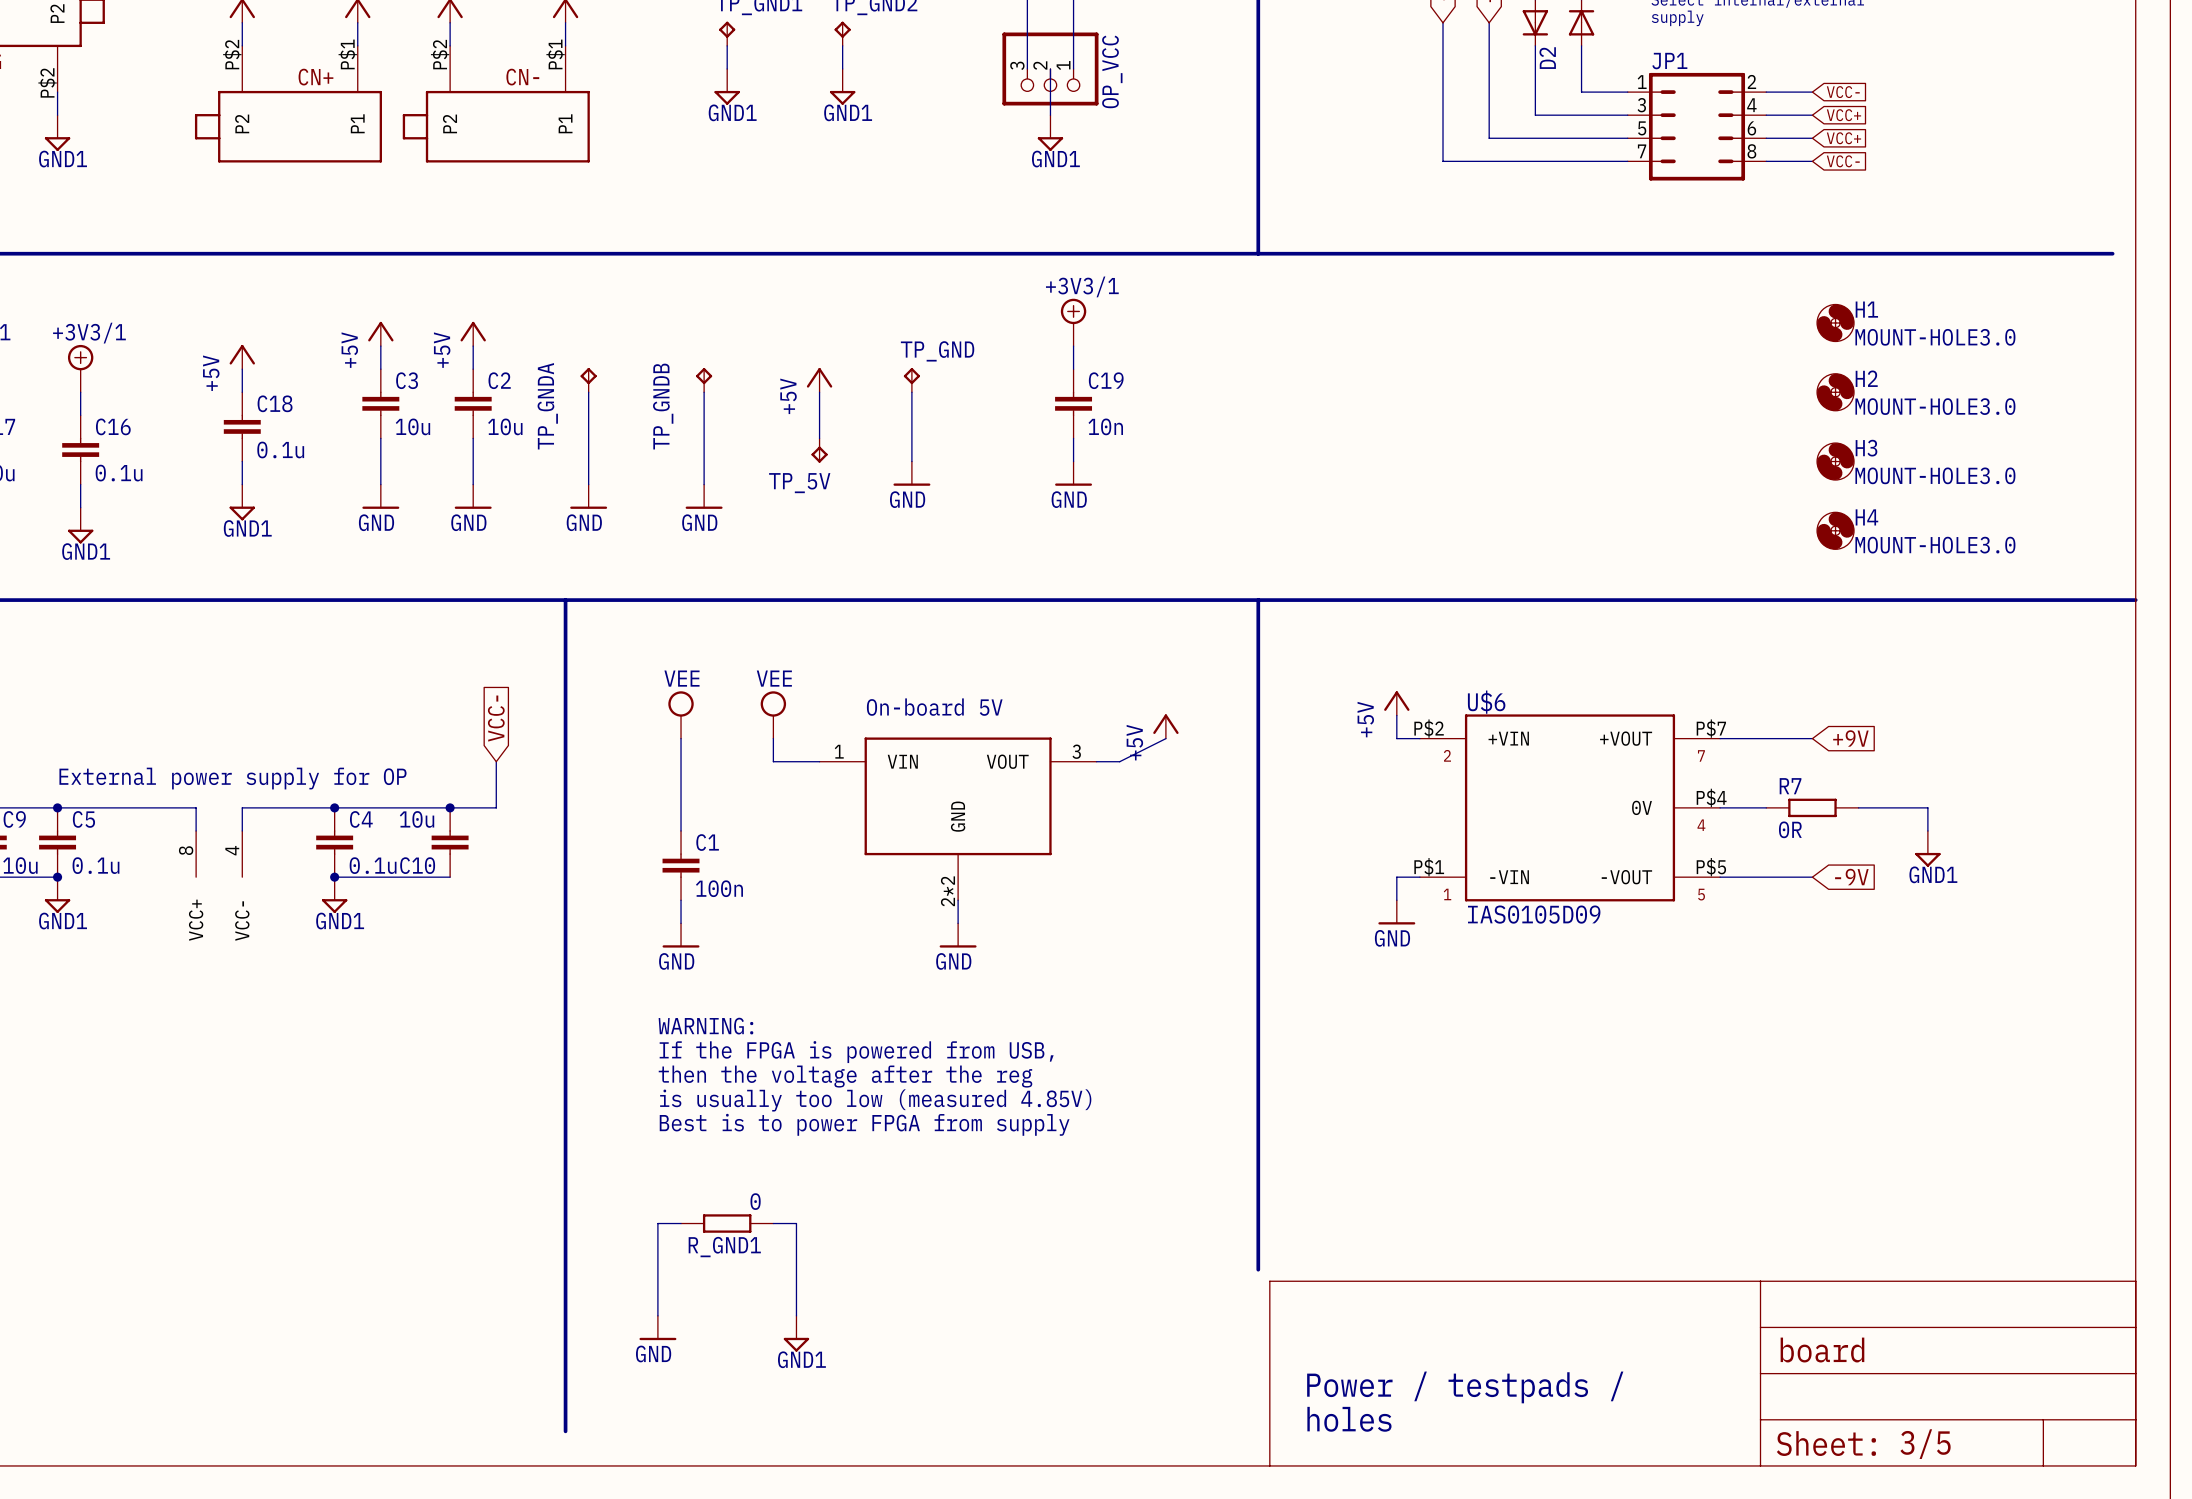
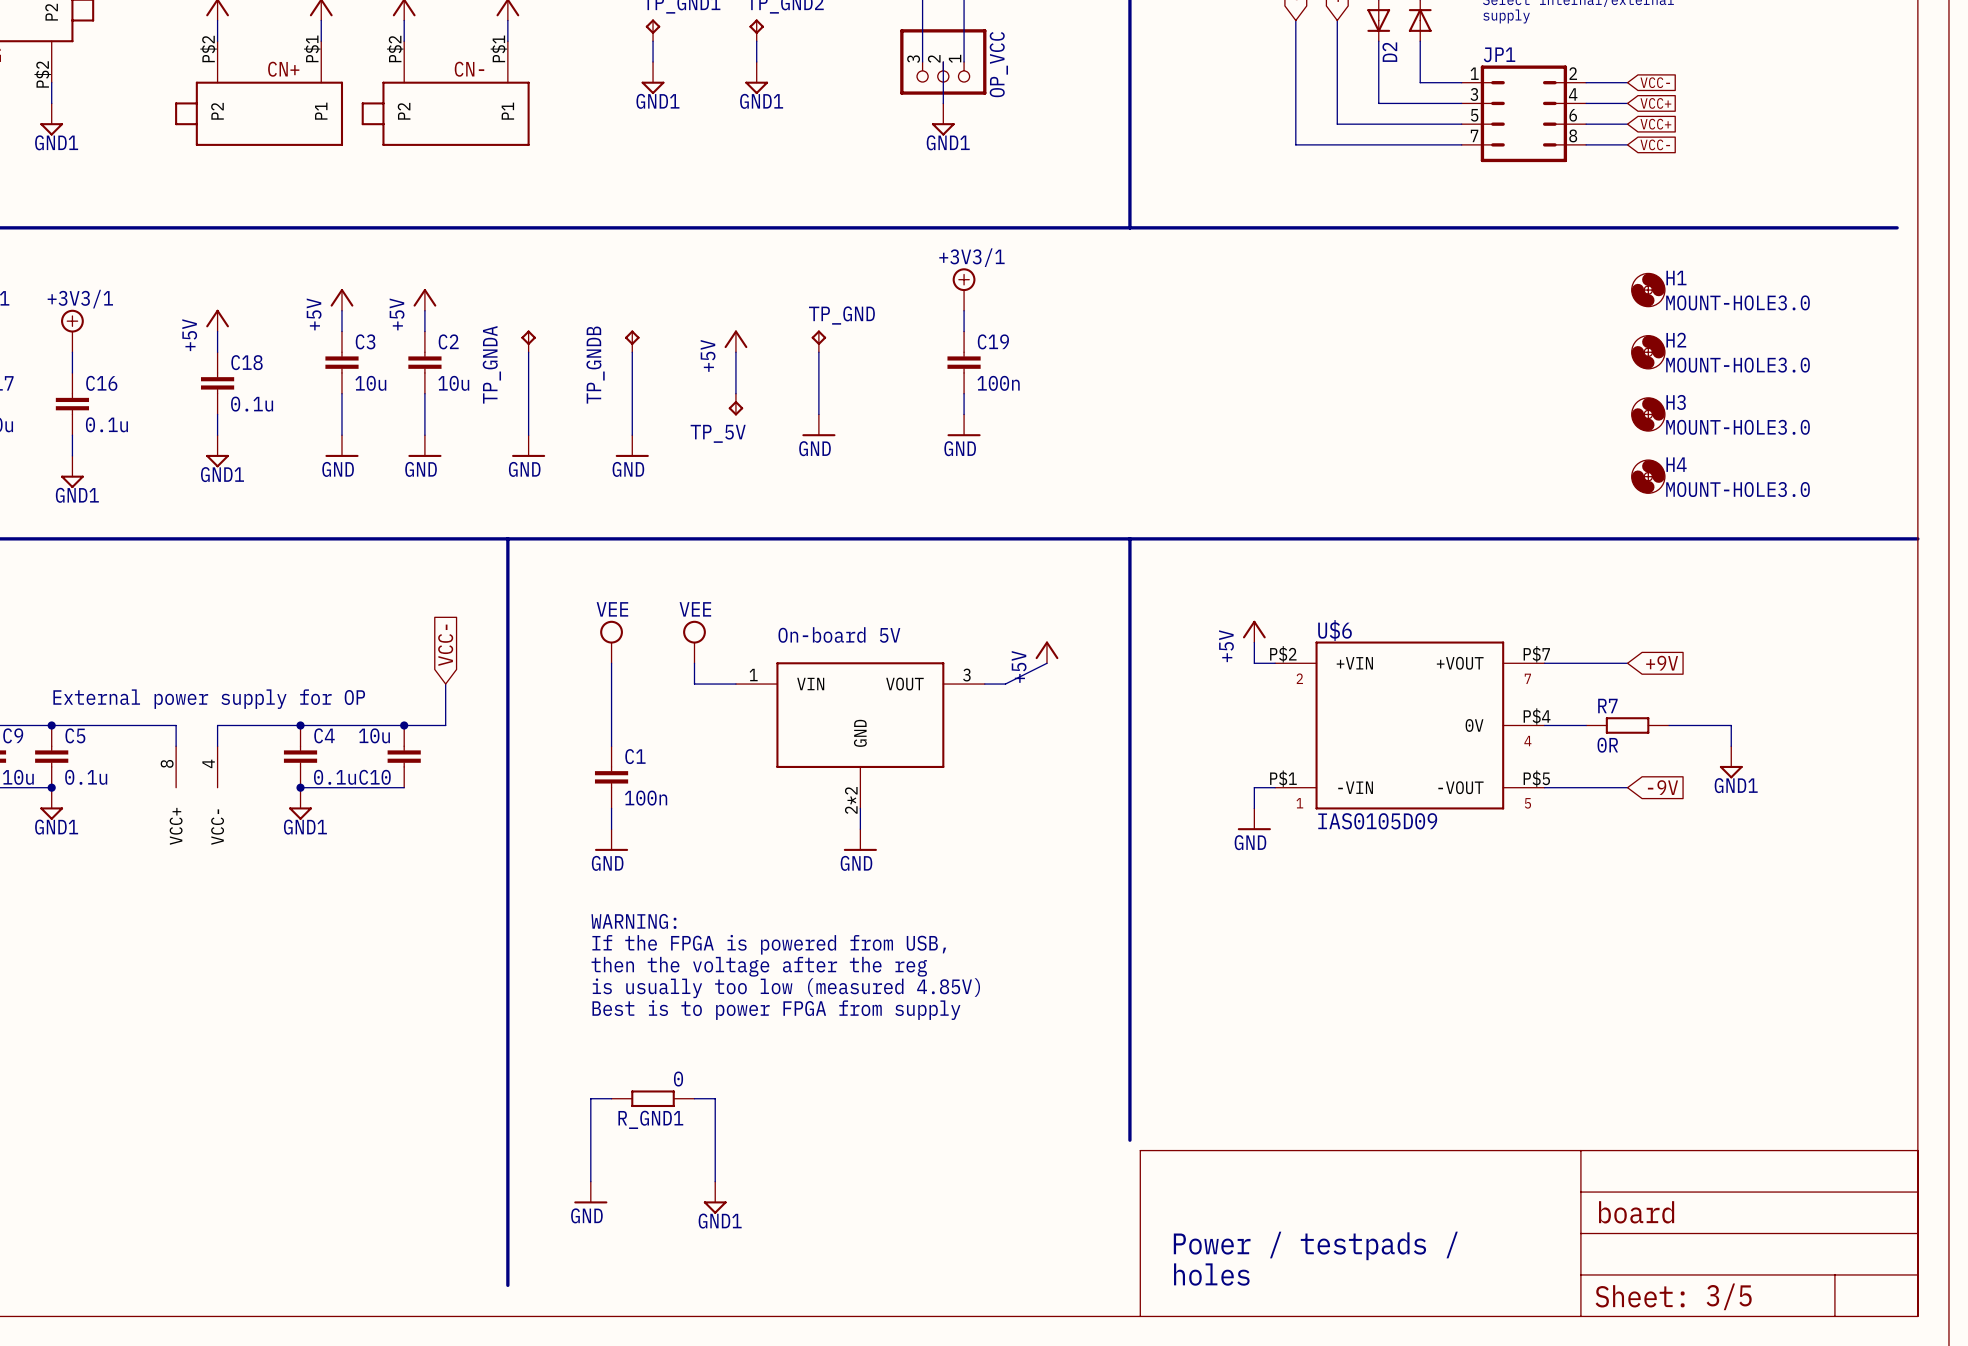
C19 value: 10n (1105, 426) -> 100n (998, 383)

